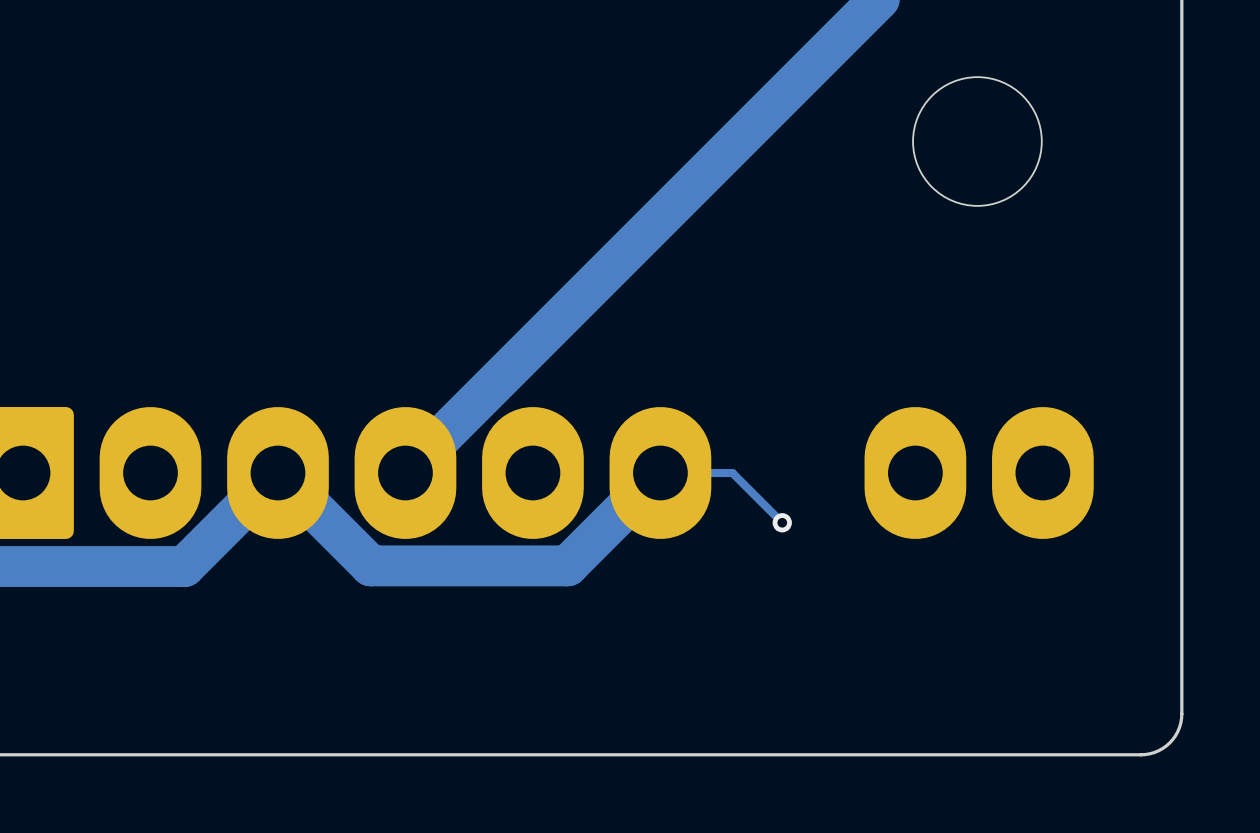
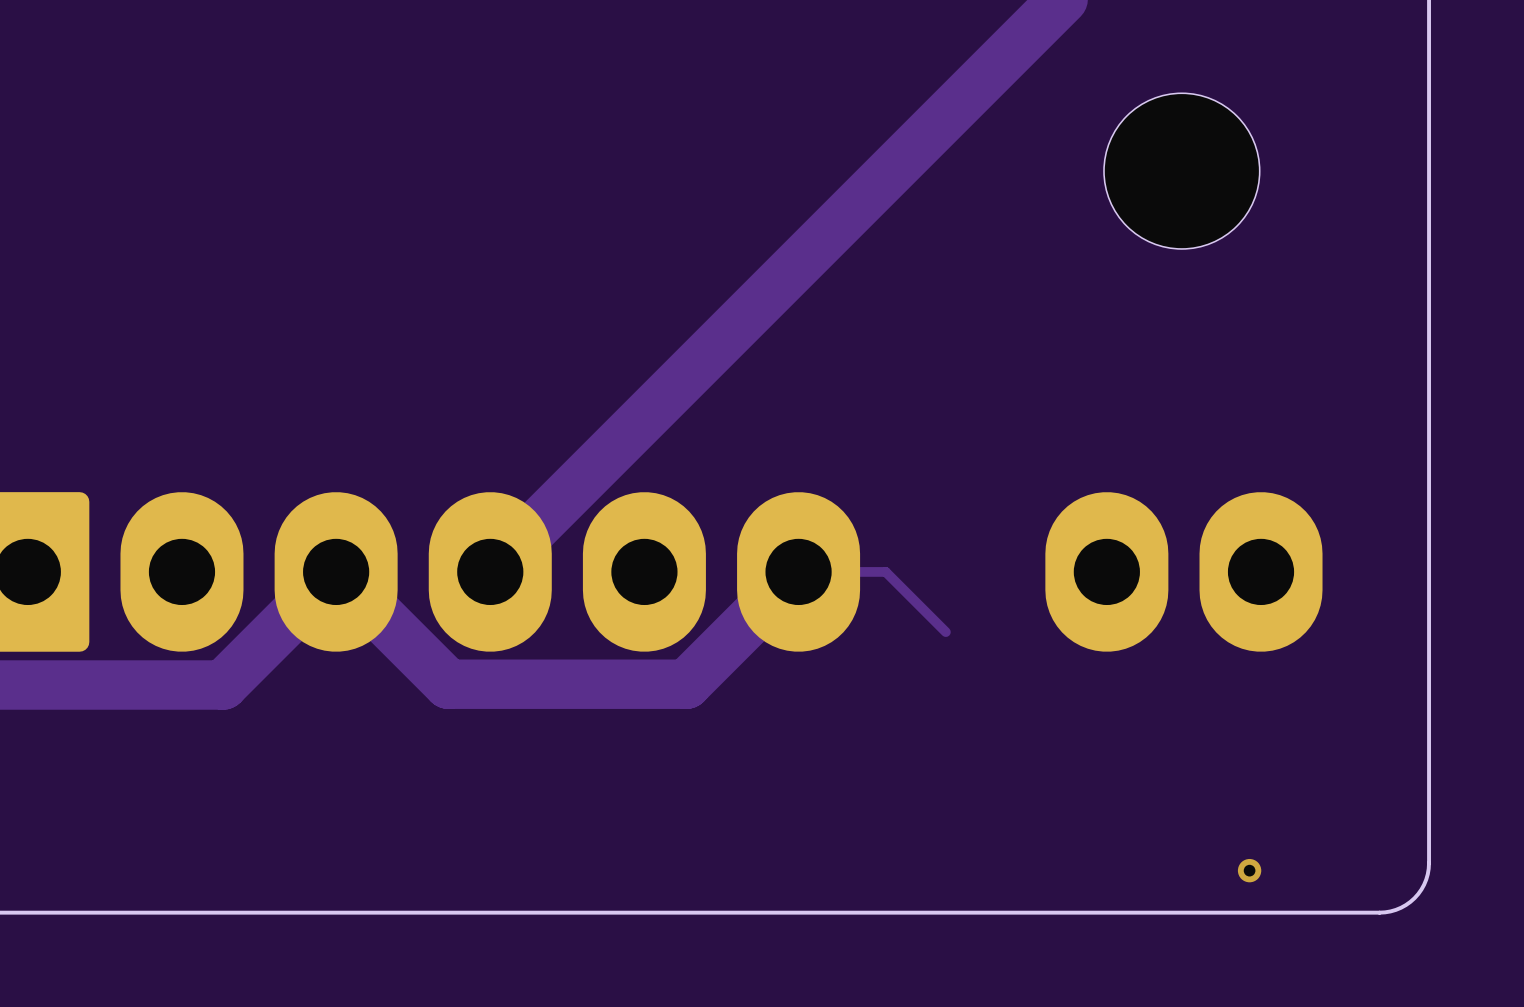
via: (782, 522) -> none
via: none -> (1249, 870)

